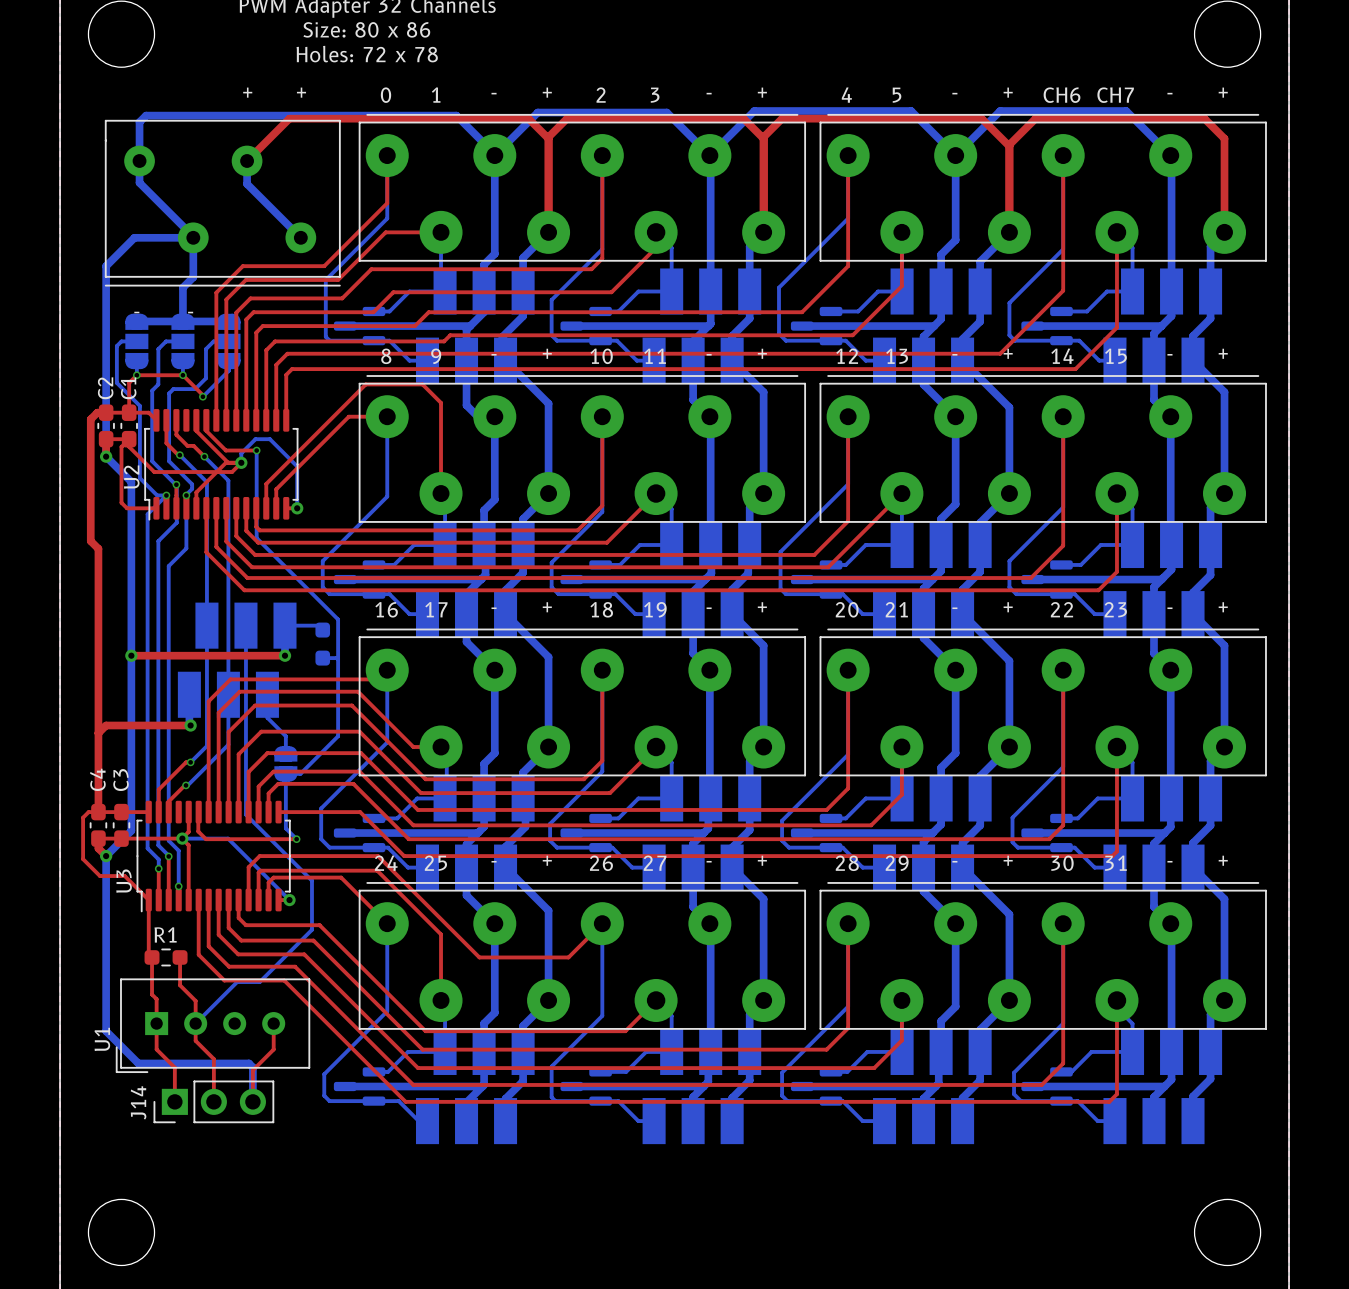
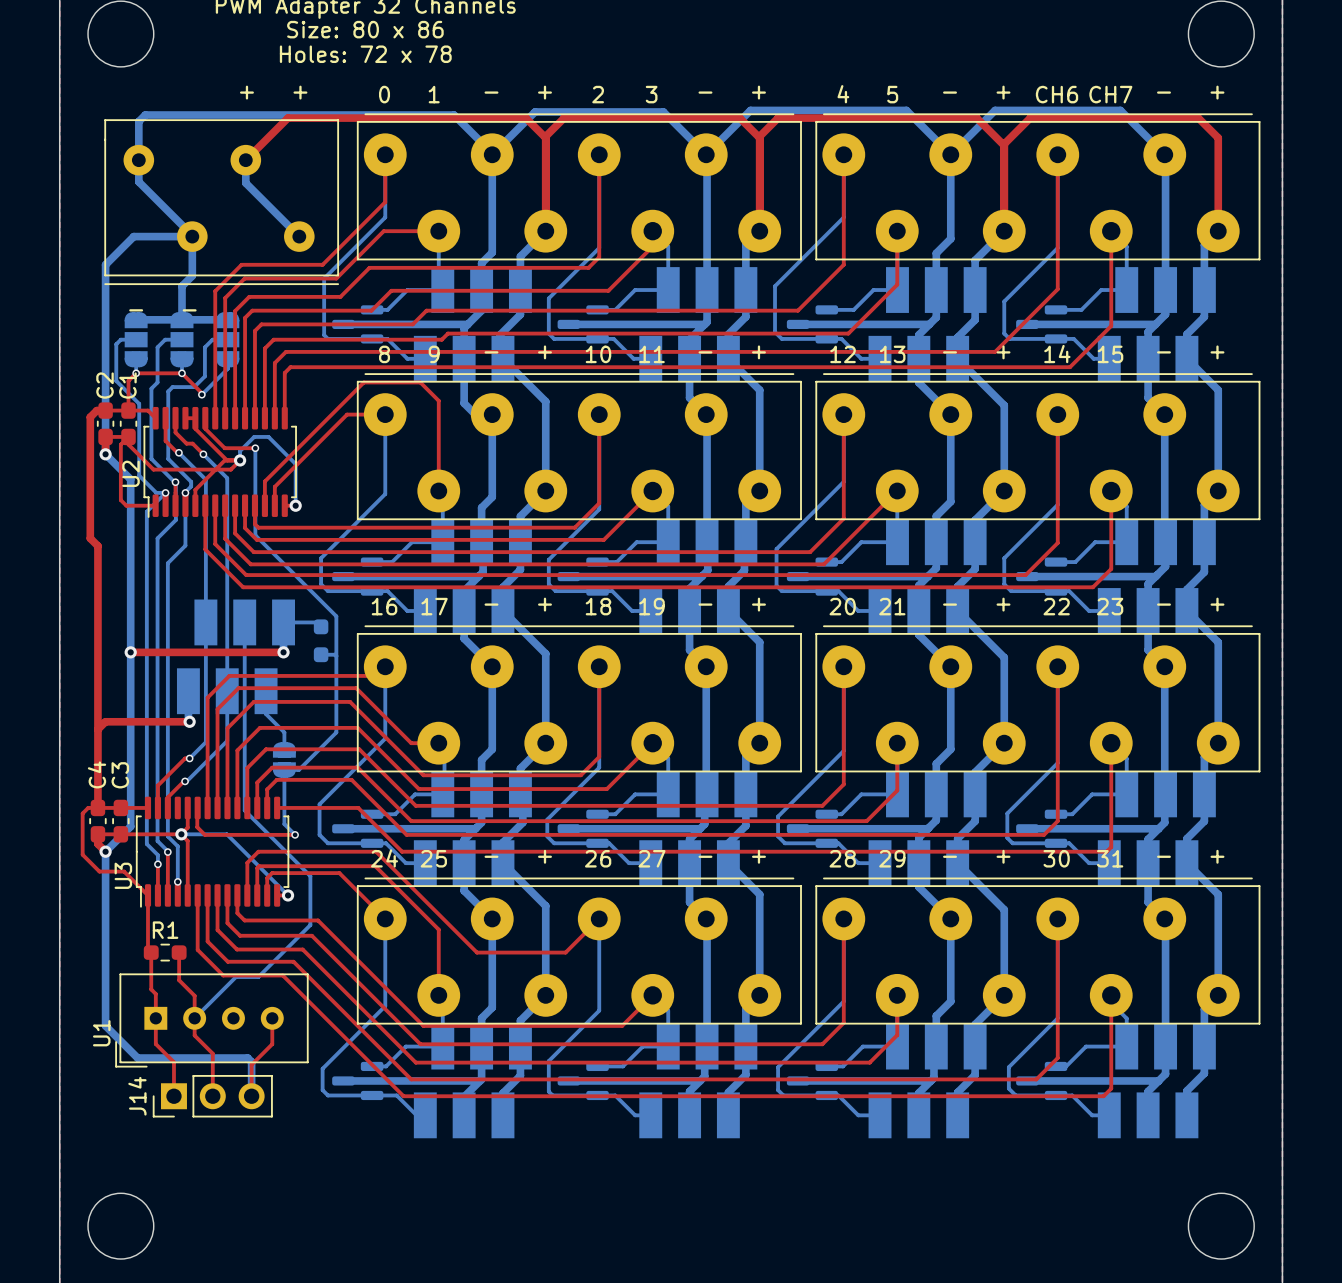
top track: none -> (185, 418) (195, 418)

